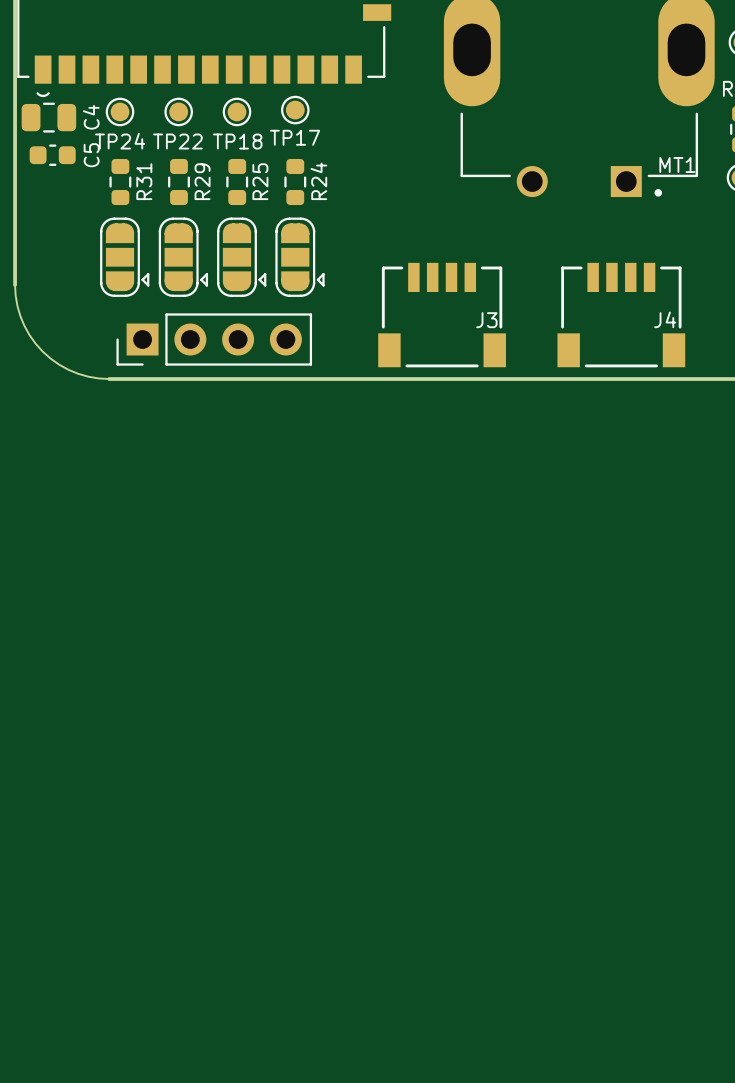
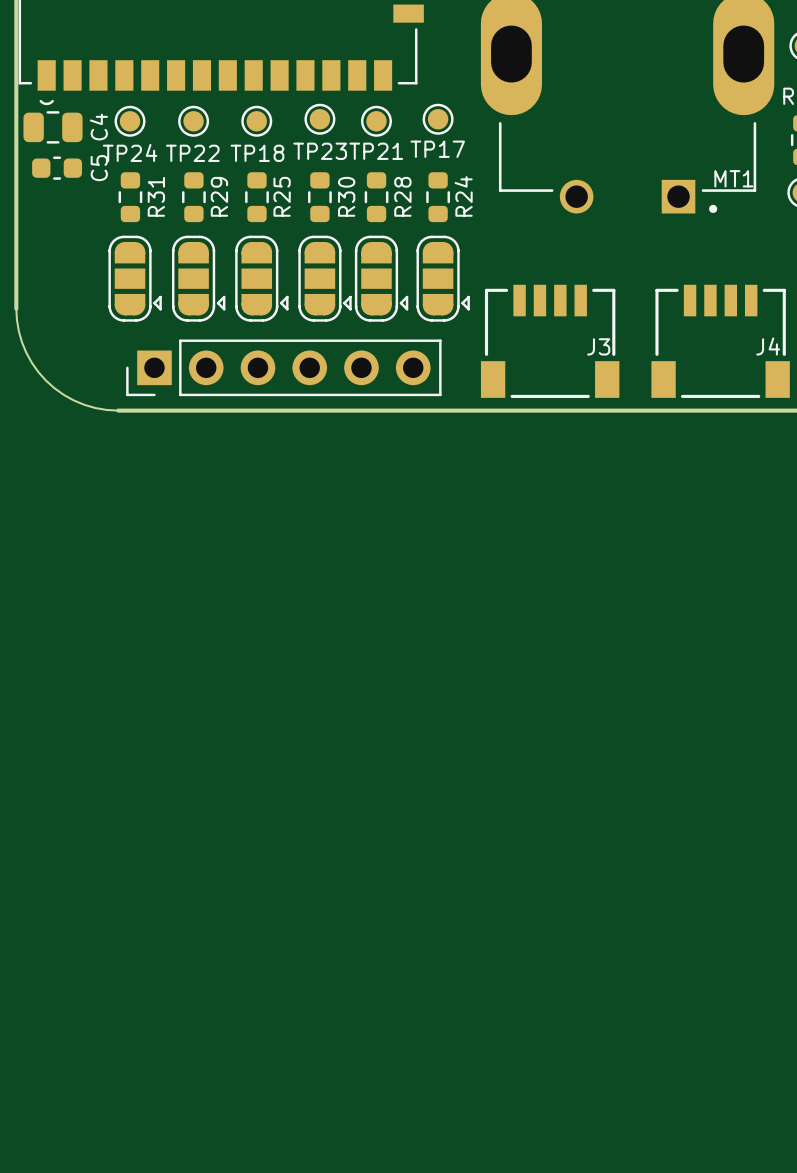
TP17: none -> (438, 119)
TP21: none -> (376, 121)
TP17 name: TP17 (294, 137) -> TP23 (320, 151)
R24 name: R24 (318, 181) -> R30 (346, 196)
R28: none -> (376, 197)
R24: none -> (438, 197)
part: none -> (381, 278)
part: none -> (443, 278)
J3 position: (442, 315) -> (550, 341)
J4 position: (621, 315) -> (720, 341)
part: (214, 339) -> none
part: none -> (283, 367)

